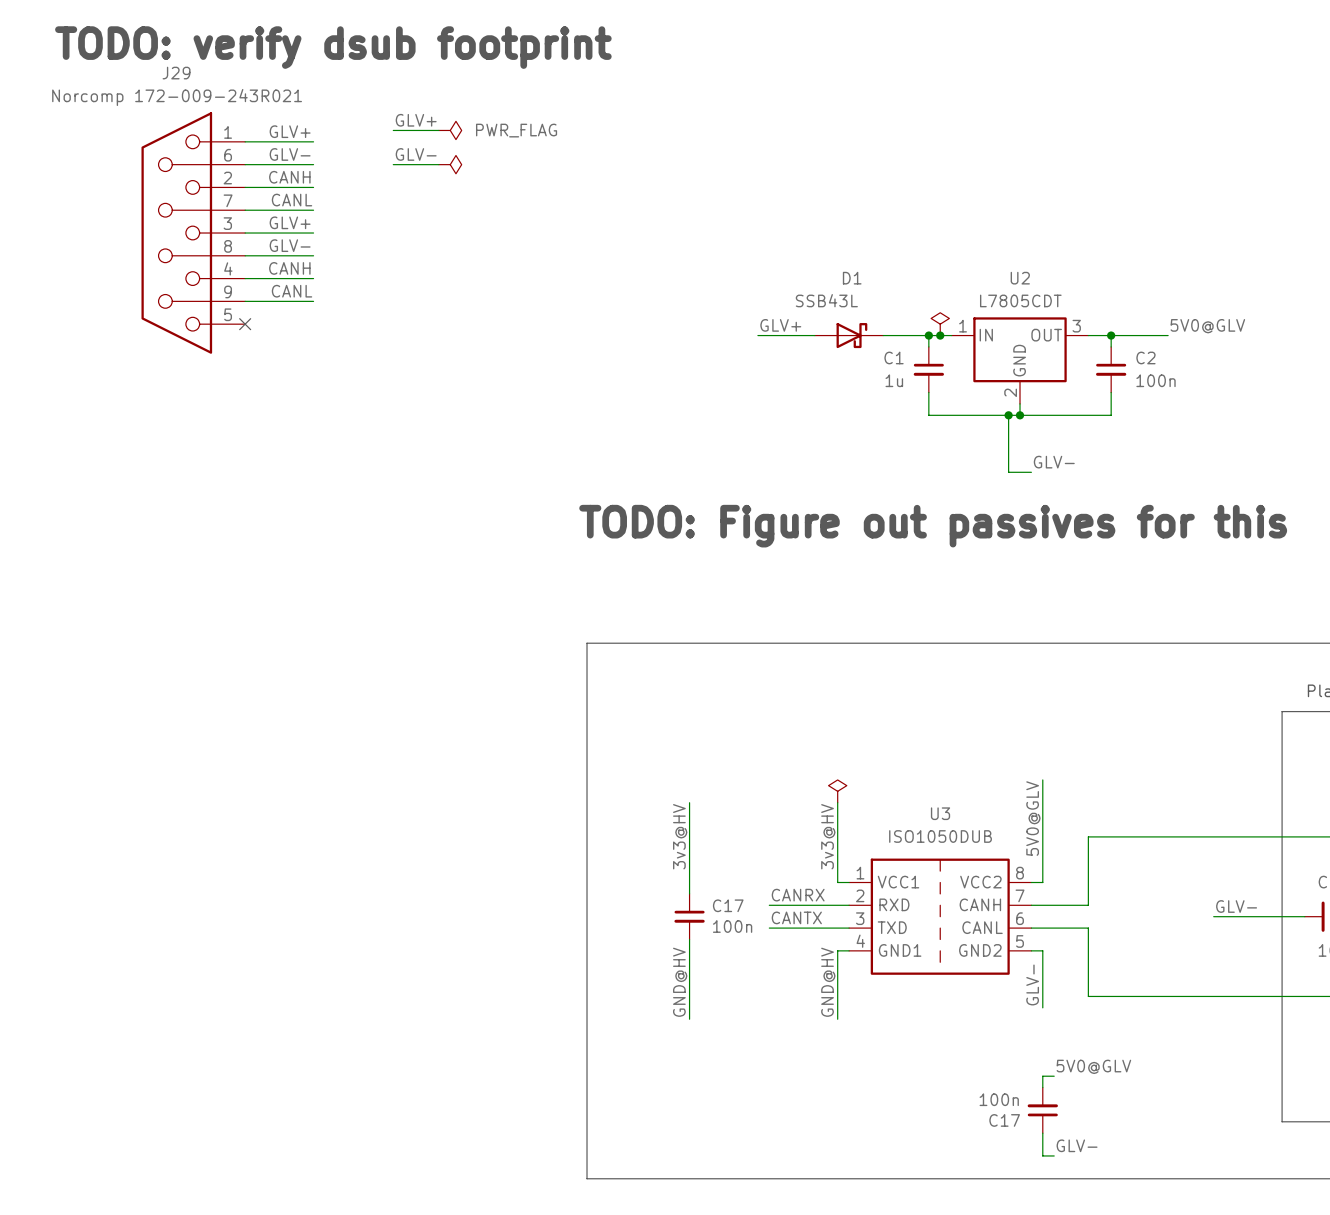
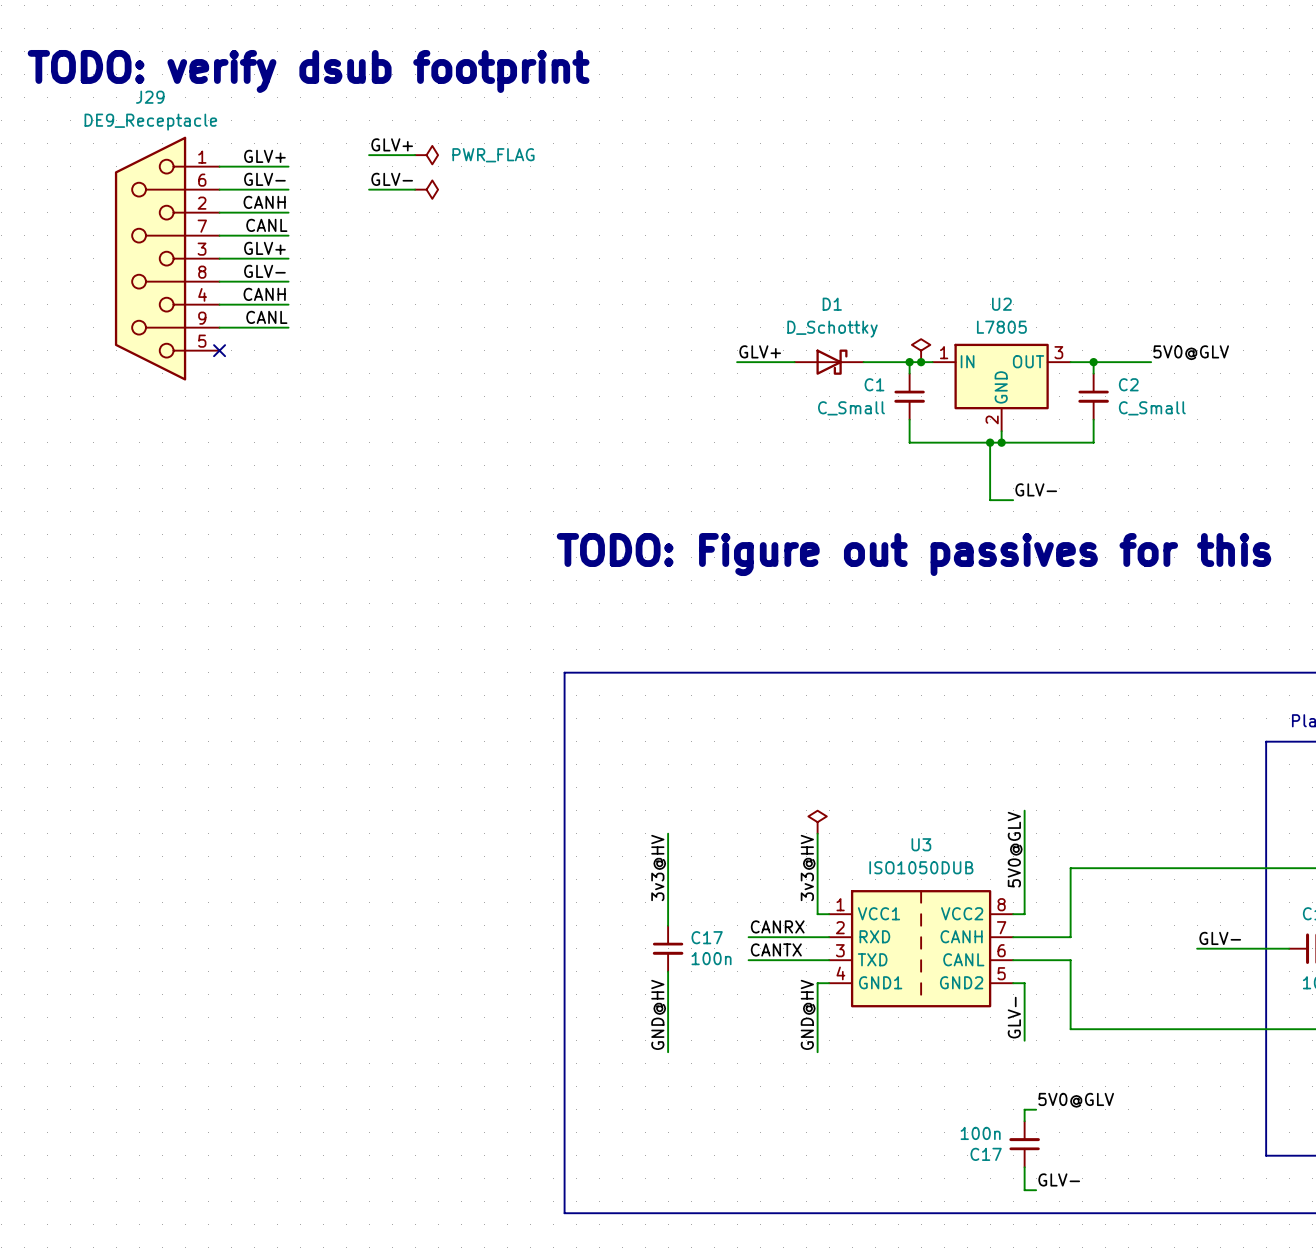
J29 value: Norcomp 172-009-243R021 (177, 97) -> DE9_Receptacle (150, 122)
D1 value: SSB43L (826, 300) -> D_Schottky (832, 329)
U2 value: L7805CDT (1020, 300) -> L7805 (1001, 327)
C1 value: 1u (894, 380) -> C_Small (851, 408)
C2 value: 100n (1156, 380) -> C_Small (1152, 408)

